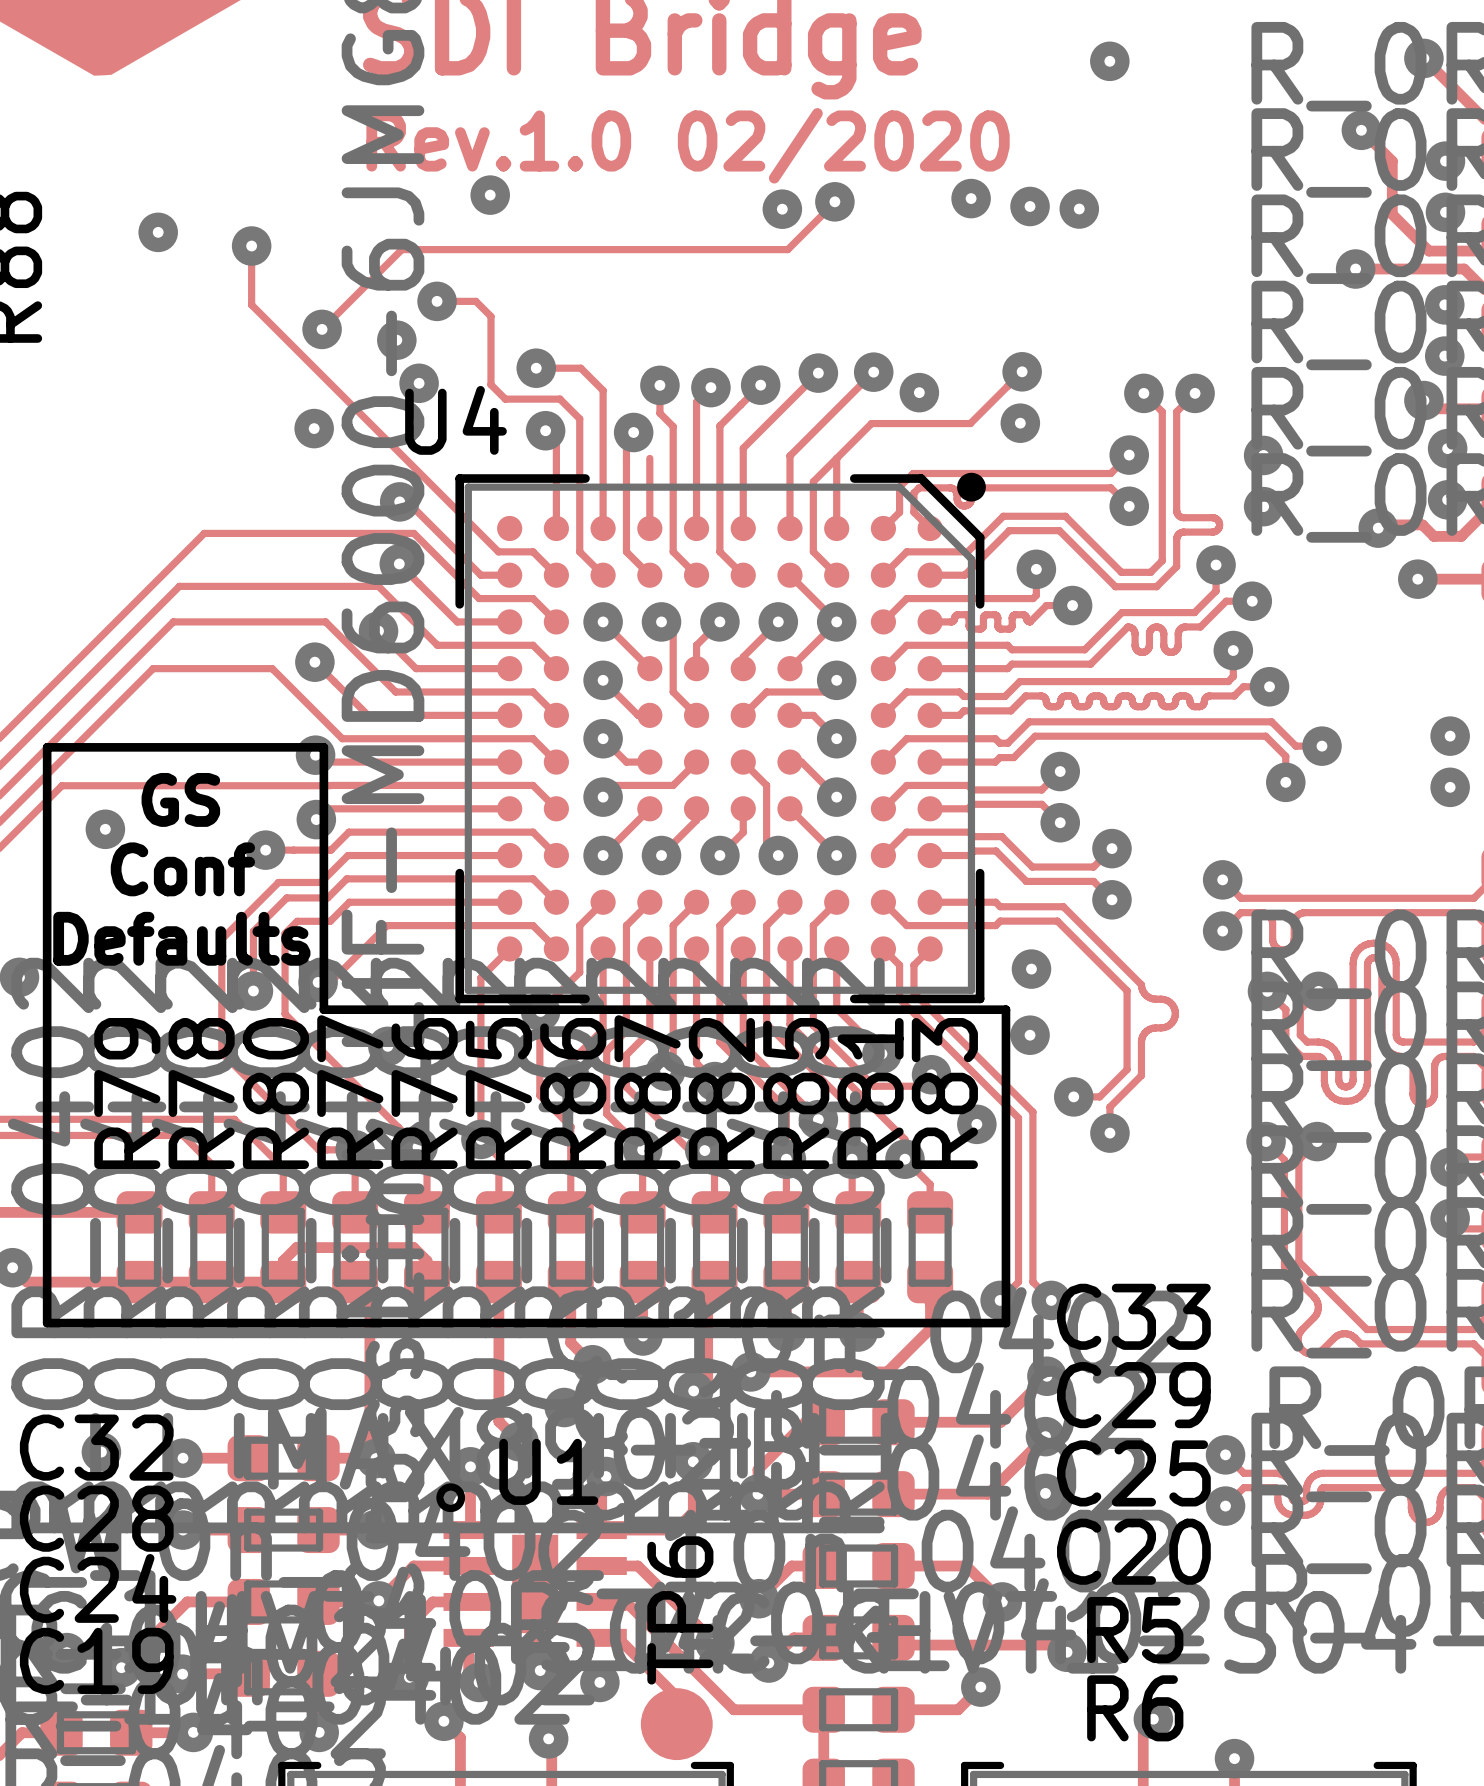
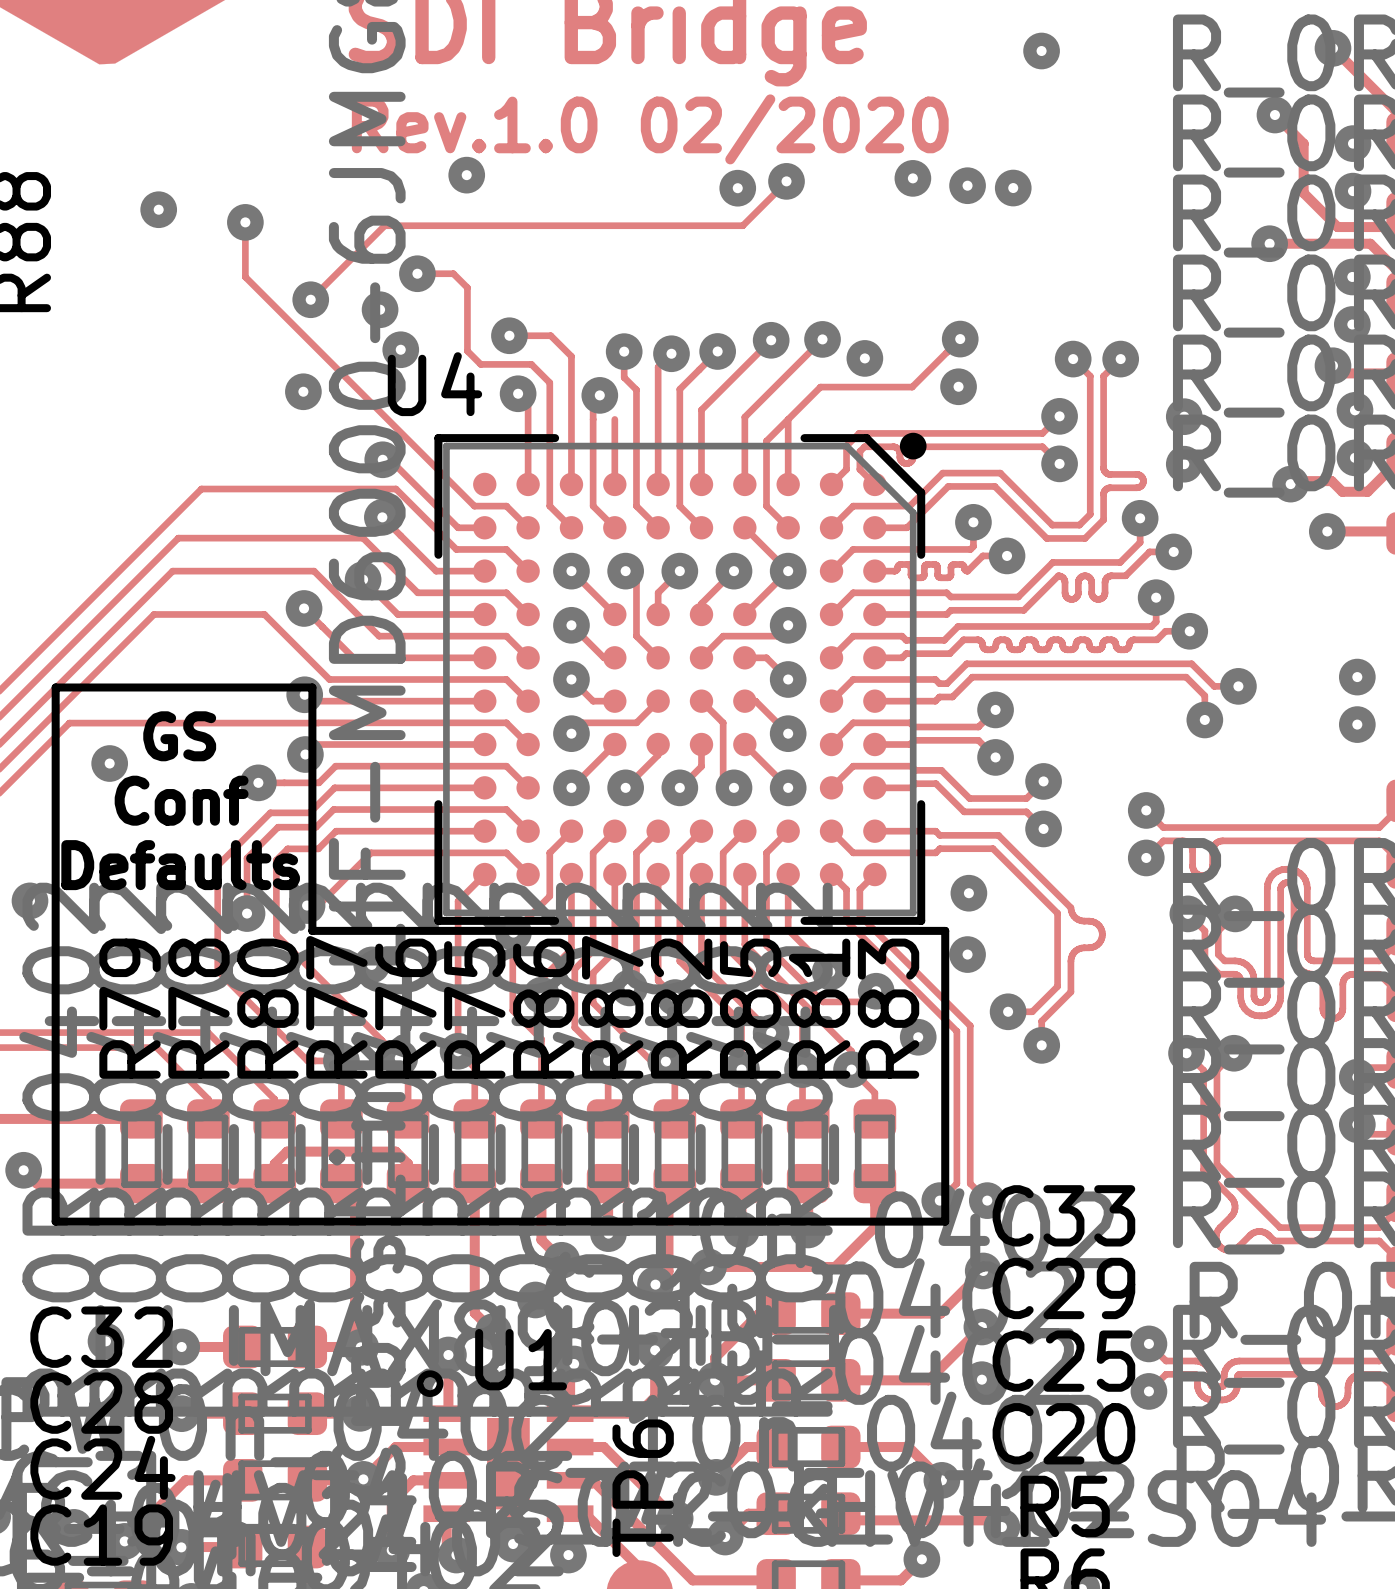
track: (211, 1119) (234, 1119) (283, 1168) (283, 1191) -> (208, 1032) (274, 1099)
track: (156, 1135) (182, 1135) (211, 1164) (211, 1191) -> (156, 1047) (208, 1099)

